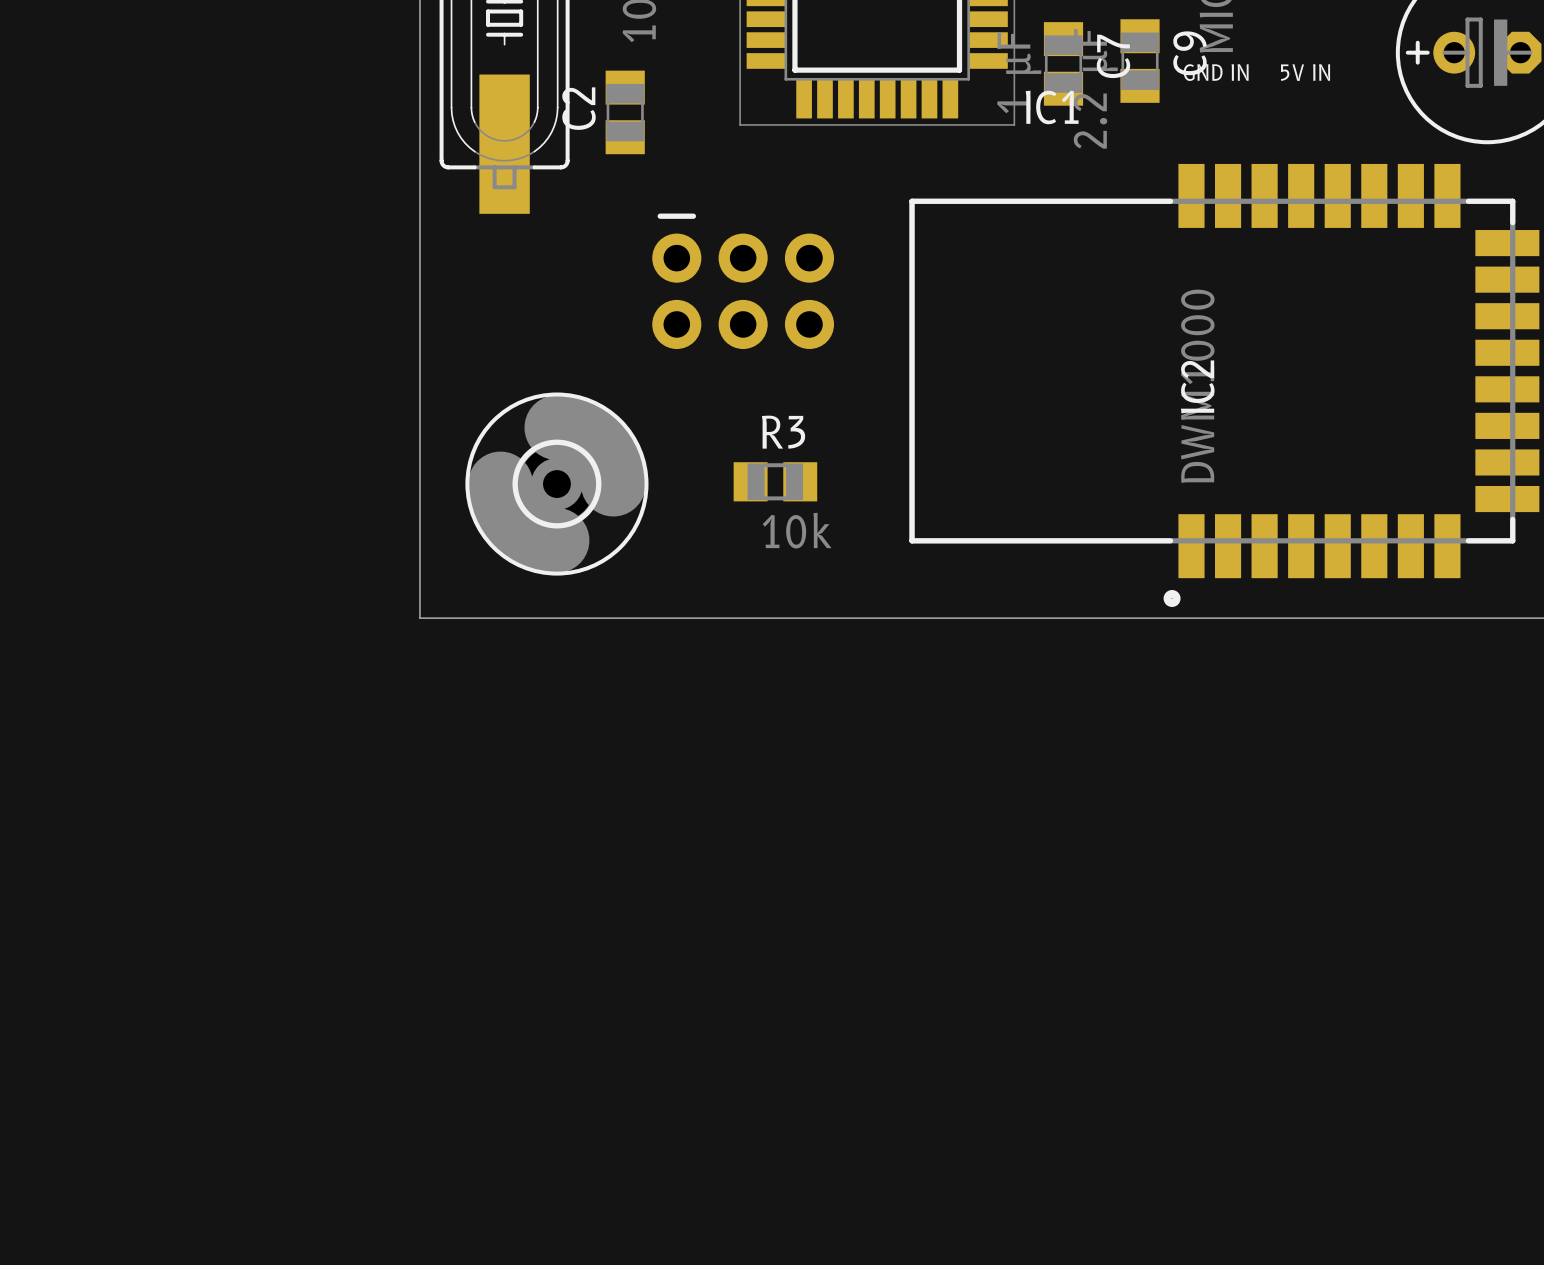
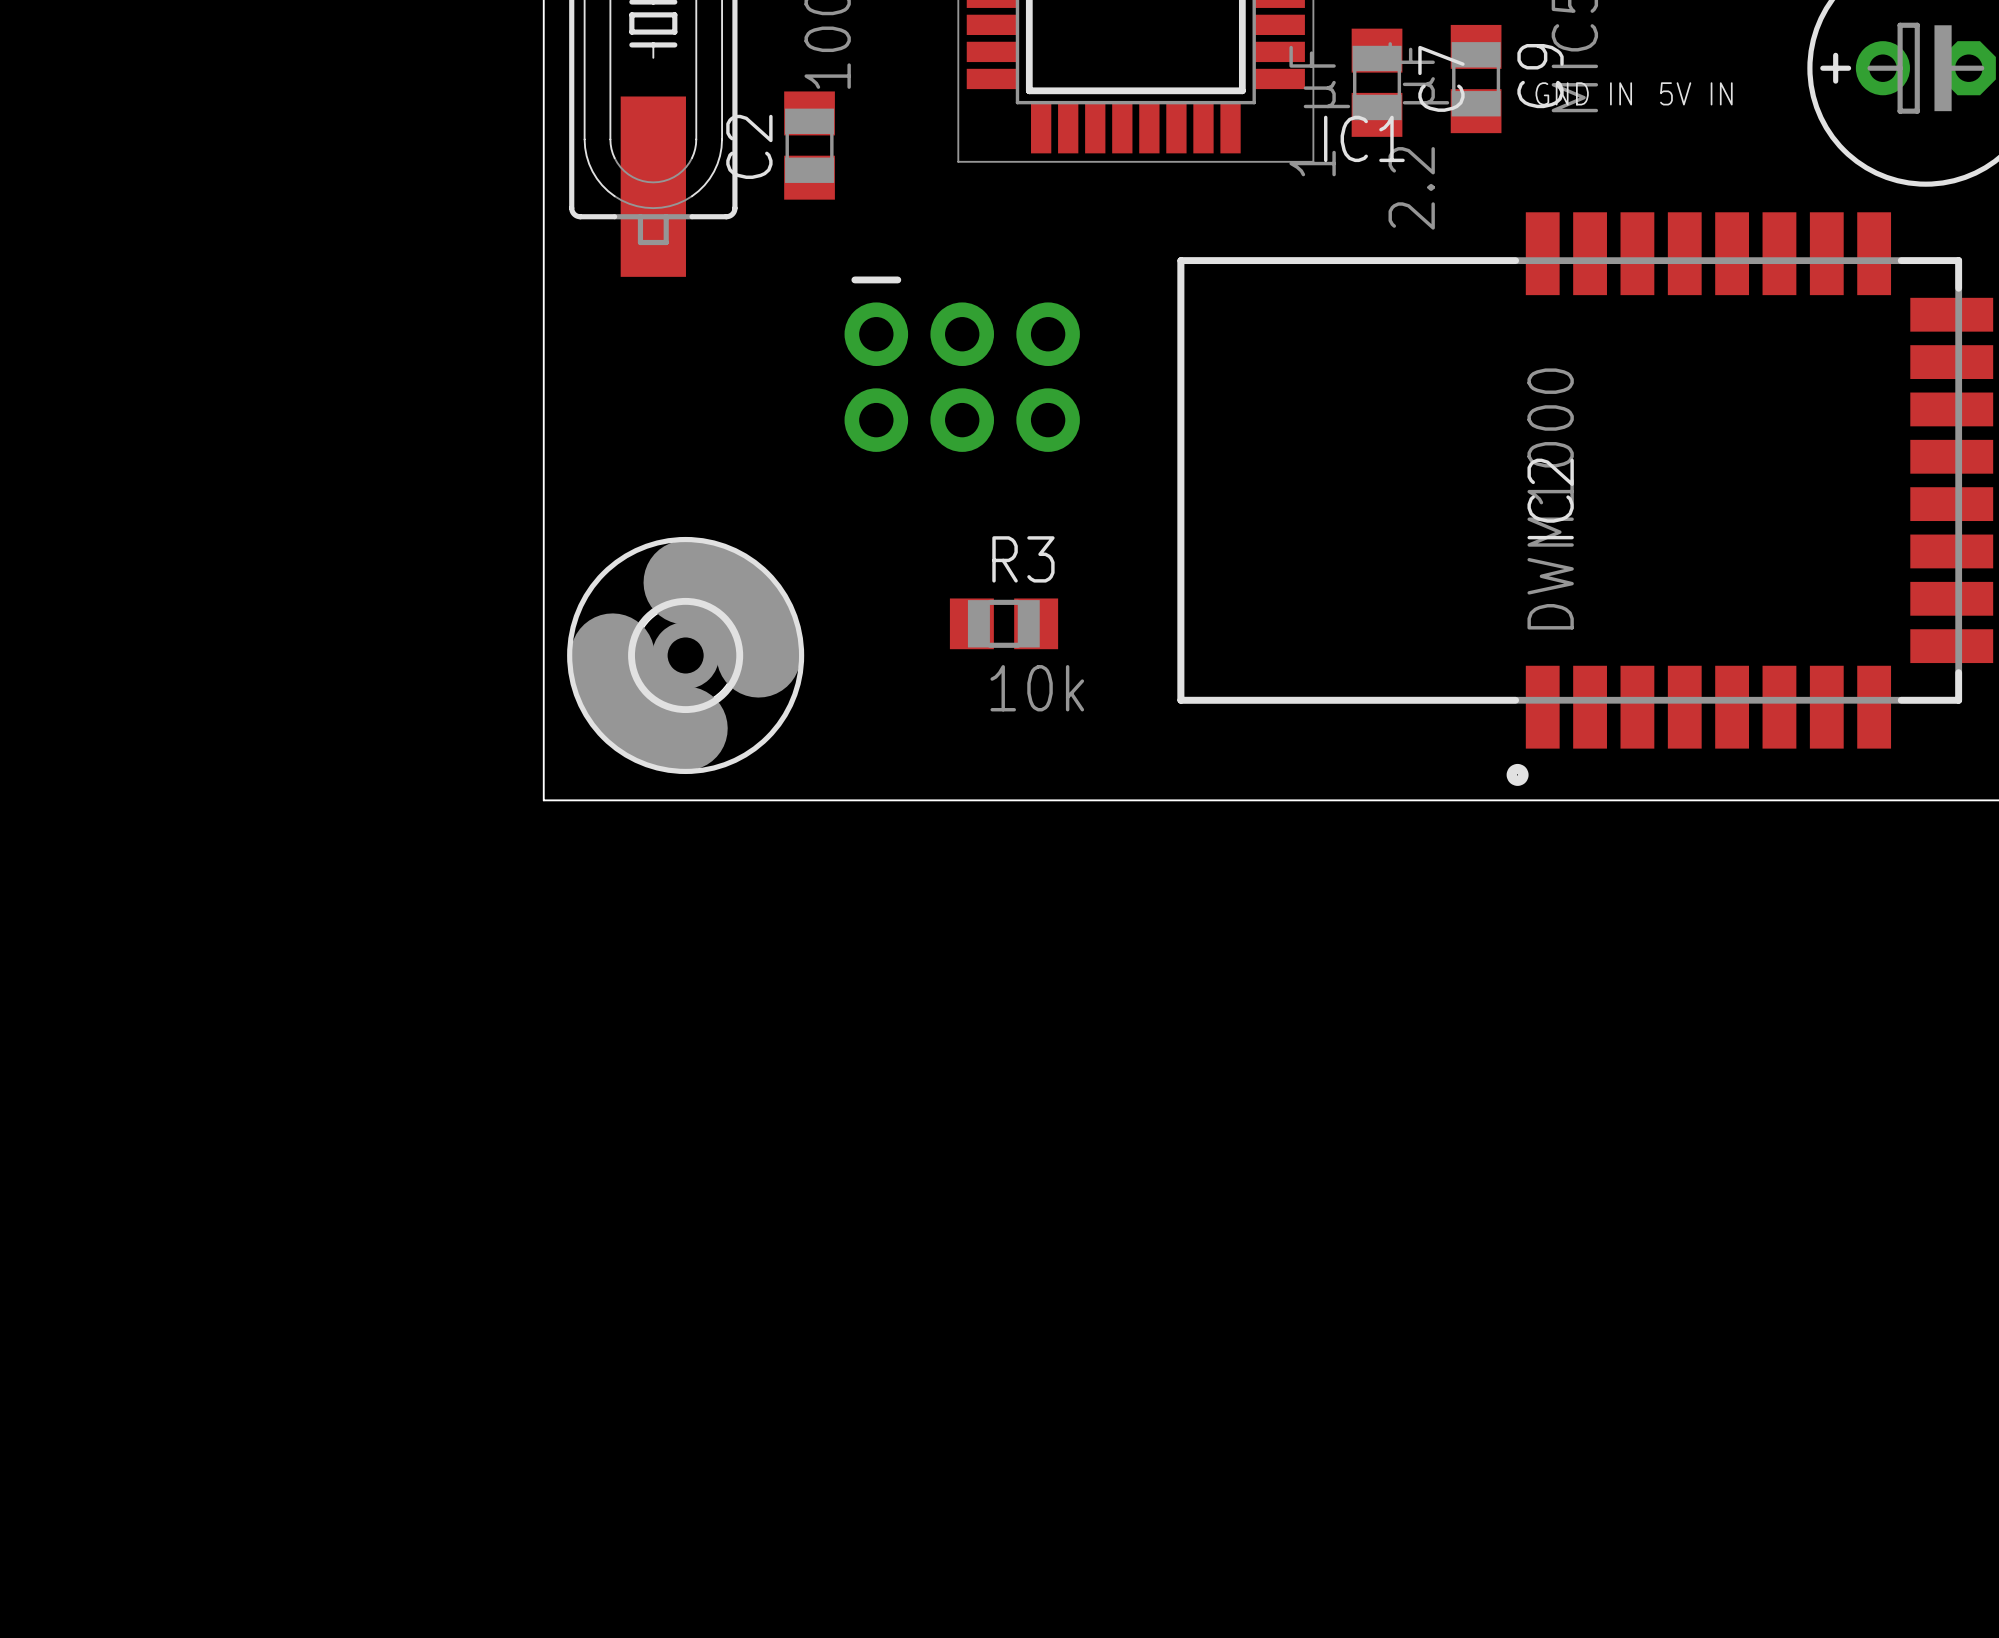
part position: (556, 484) -> (685, 655)

